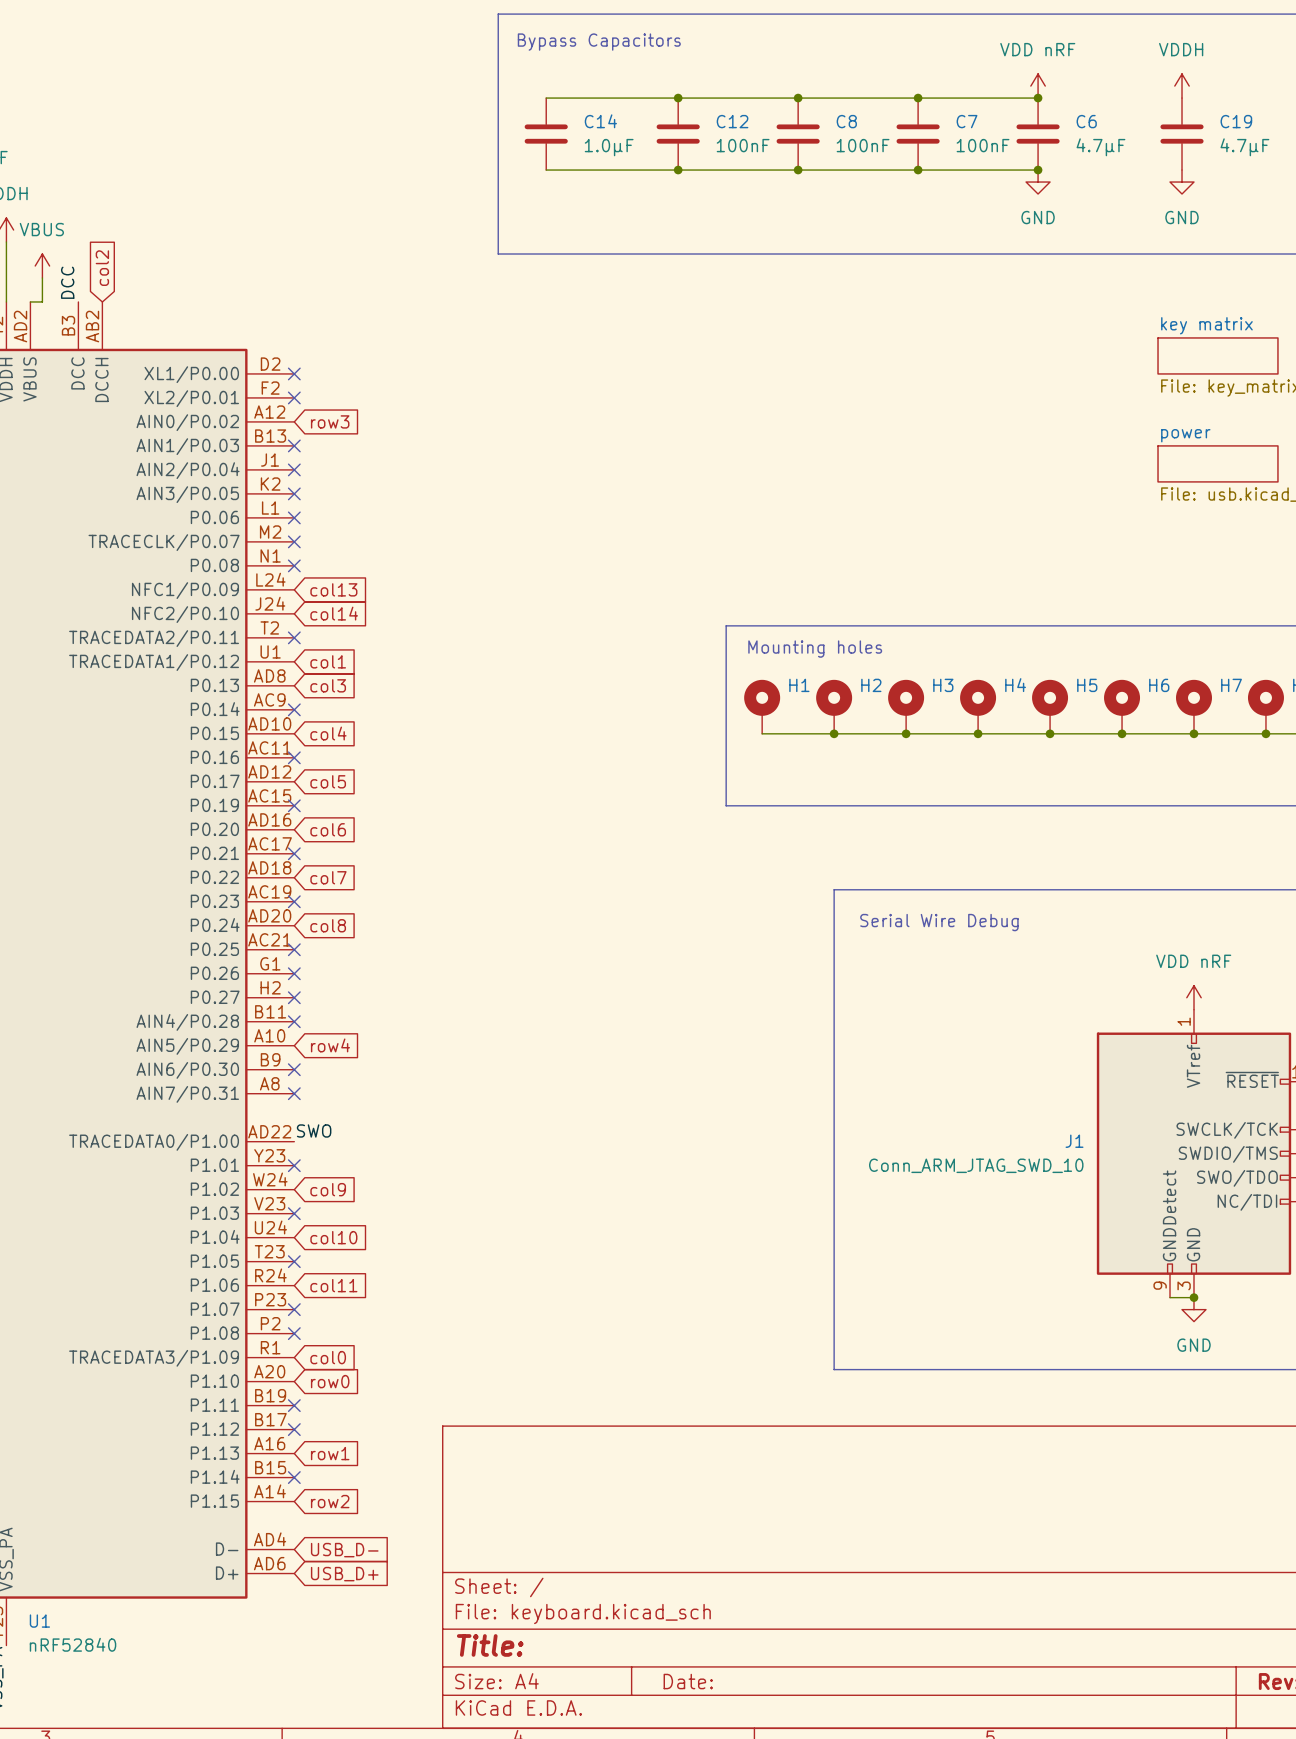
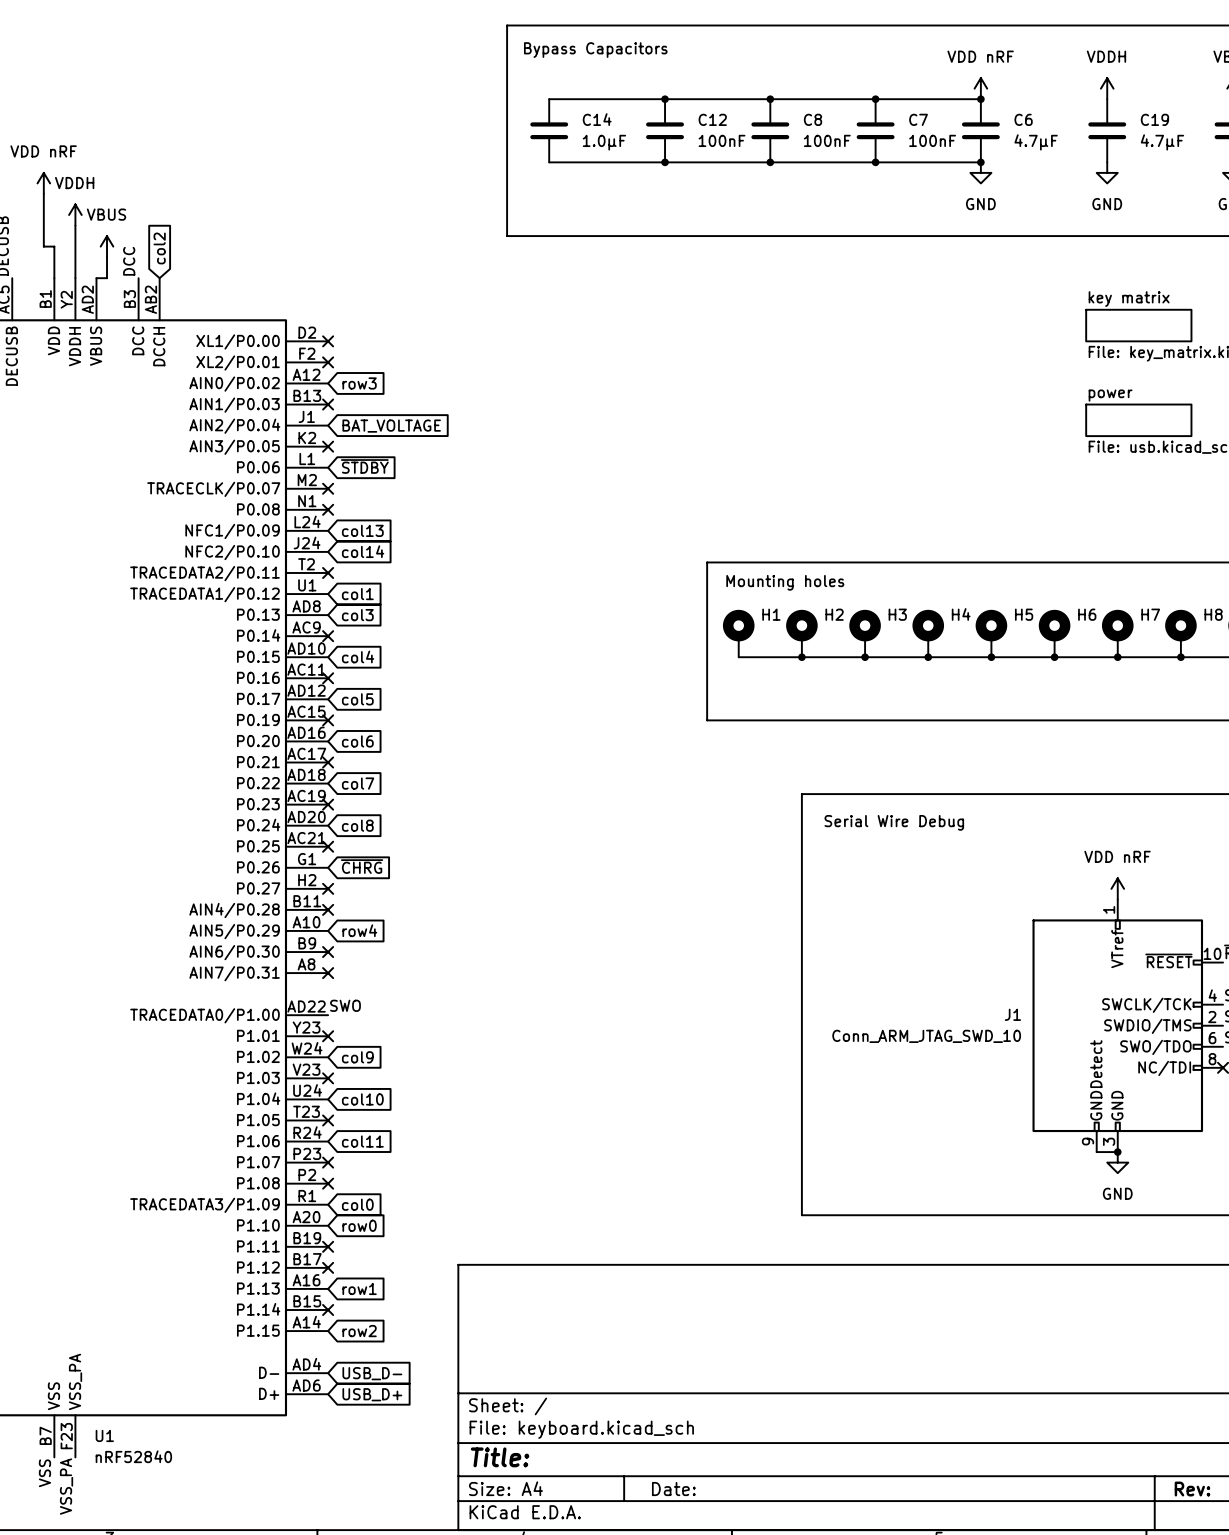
no-connect mark: (294, 469) -> none
global label: none -> BAT_VOLTAGE (391, 426)
global label: none -> ~{STDBY} (364, 466)
no-connect mark: (294, 517) -> none
global label: none -> ~{CHRG} (362, 866)
no-connect mark: (294, 973) -> none

